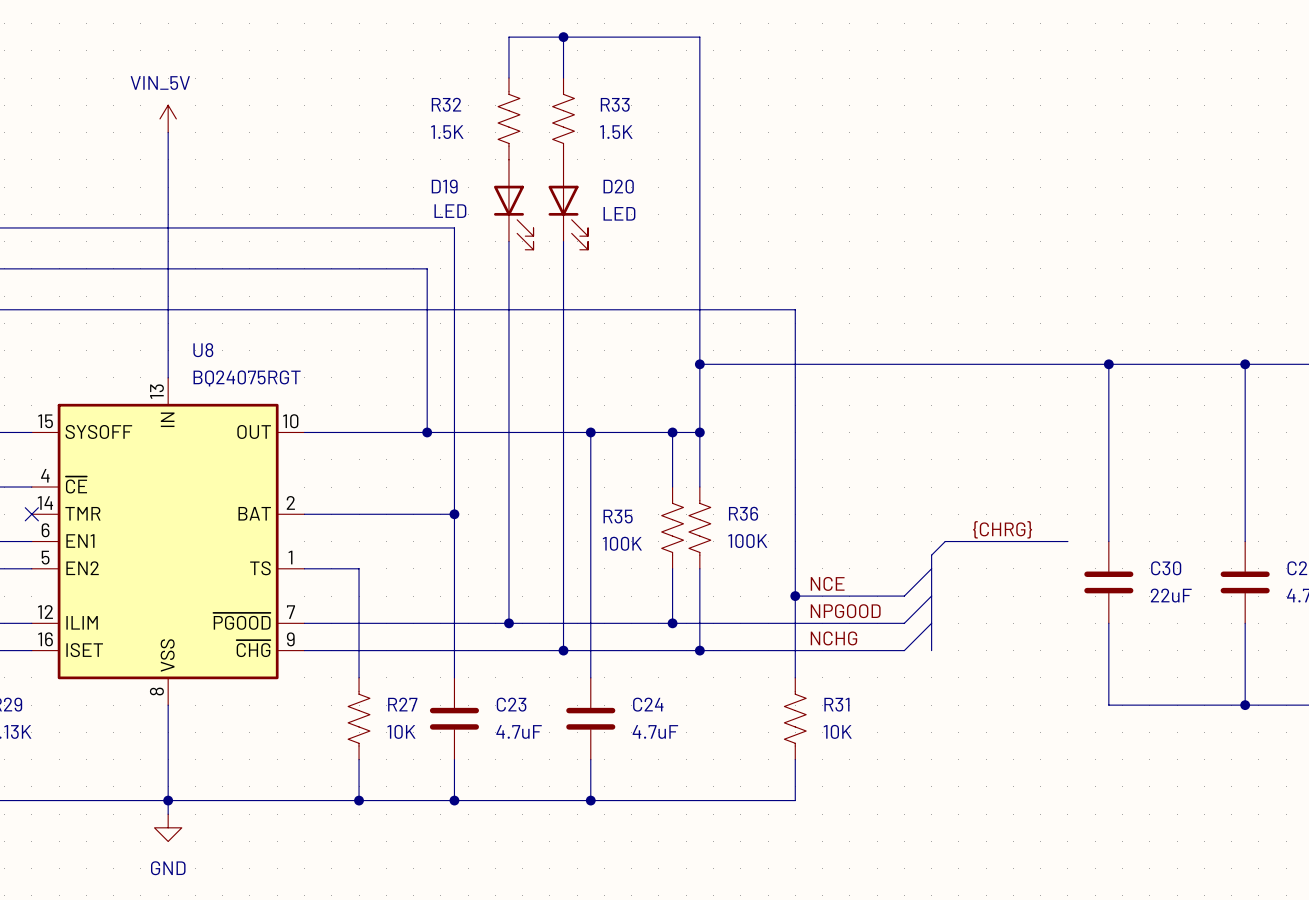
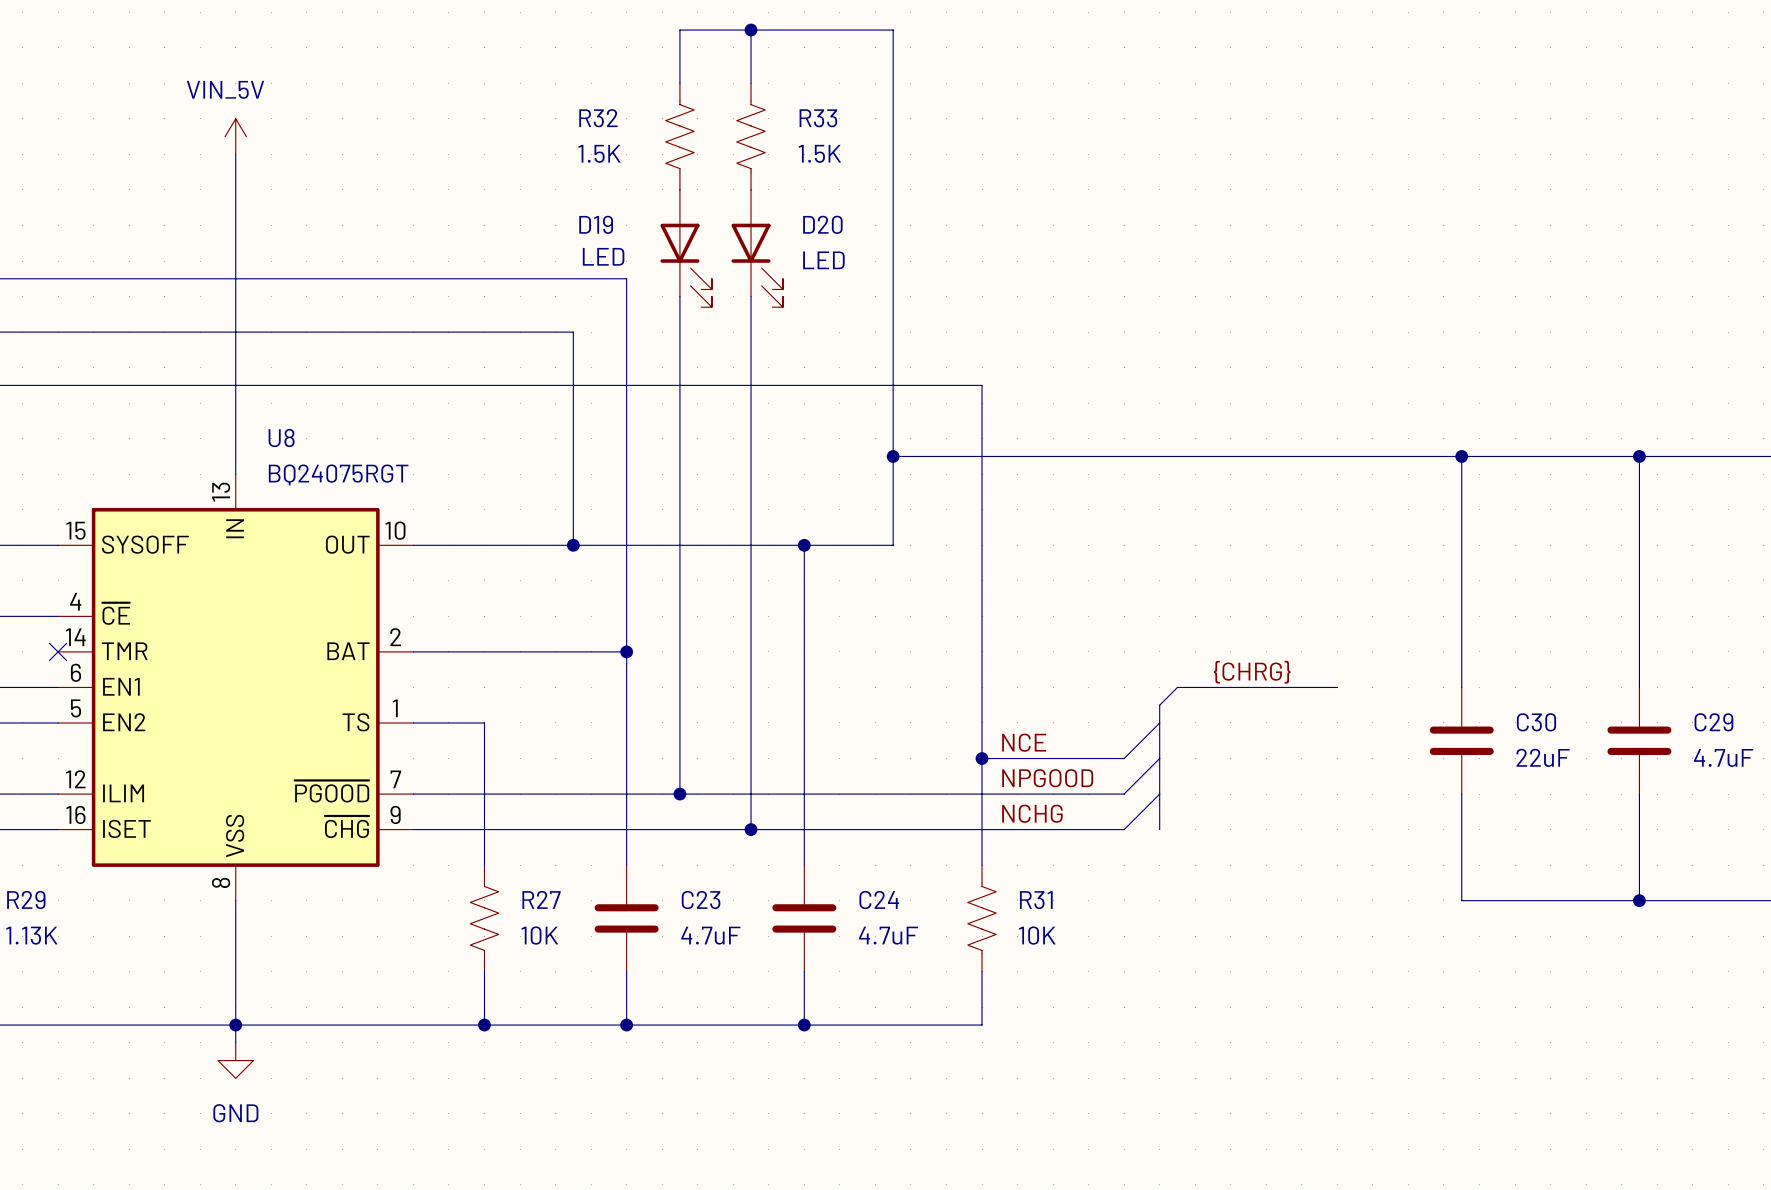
wire: (672, 37) (699, 37) (699, 487) -> (893, 30) (893, 545)
wire: (454, 227) (454, 677) -> (608, 278) (626, 278) (626, 865)
wire: (740, 309) (795, 309) (795, 677) -> (982, 385) (982, 865)
wire: none -> (893, 456) (928, 456)
junction position: (699, 364) -> (893, 456)
wire: (590, 432) (590, 677) -> (804, 545) (804, 865)
junction position: (590, 432) -> (804, 545)
junction: (672, 432) -> none
wire: (699, 432) (672, 432) (672, 487) -> none
junction: (699, 432) -> none
wire: none -> (608, 651) (626, 651)
junction position: (454, 514) -> (626, 651)
R35: 100K (672, 527) -> none
R36: 100K (699, 527) -> none
label position: {CHRG} (1002, 529) -> {CHRG} (1252, 672)
bus: (945, 541) (931, 555) (931, 650) -> (1248, 687) (1177, 687) (1159, 705) (1159, 829)
bus: (1013, 541) (1067, 541) -> none
wire: (672, 568) (672, 623) -> none
wire: (699, 568) (699, 650) -> none
wire: (931, 568) (904, 596) (849, 596) -> (1159, 722) (1124, 758)
label position: NCE (827, 583) -> NCE (1024, 742)
wire: none -> (982, 758) (1053, 758)
junction: none -> (982, 758)
junction: (795, 596) -> none
wire: (931, 596) (904, 623) (849, 623) -> (1159, 758) (1124, 794)
label position: NPGOOD (845, 611) -> NPGOOD (1047, 778)
junction: (672, 623) -> none
wire: (931, 623) (904, 650) (849, 650) -> (1159, 794) (1124, 829)
label position: NCHG (833, 638) -> NCHG (1032, 813)
junction: (699, 650) -> none
C23 position: (454, 718) -> (626, 918)
C24 position: (590, 718) -> (804, 918)
R31 position: (795, 718) -> (982, 918)
wire: (454, 759) (454, 800) -> (626, 971) (626, 1025)
wire: (590, 759) (590, 800) -> (804, 971) (804, 1025)
wire: (795, 759) (795, 800) (740, 800) -> (982, 971) (982, 1025)
junction position: (454, 800) -> (626, 1025)
junction position: (590, 800) -> (804, 1025)

